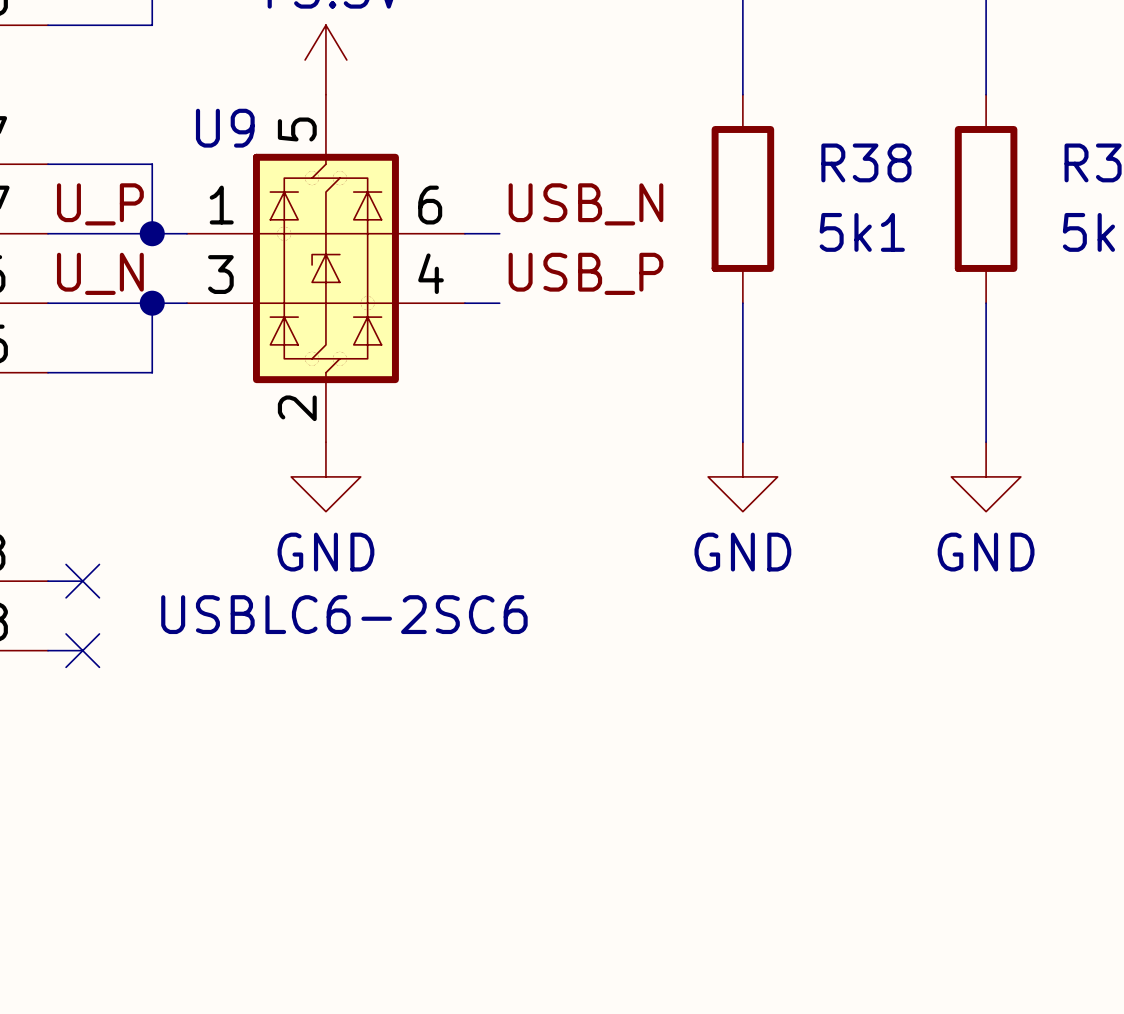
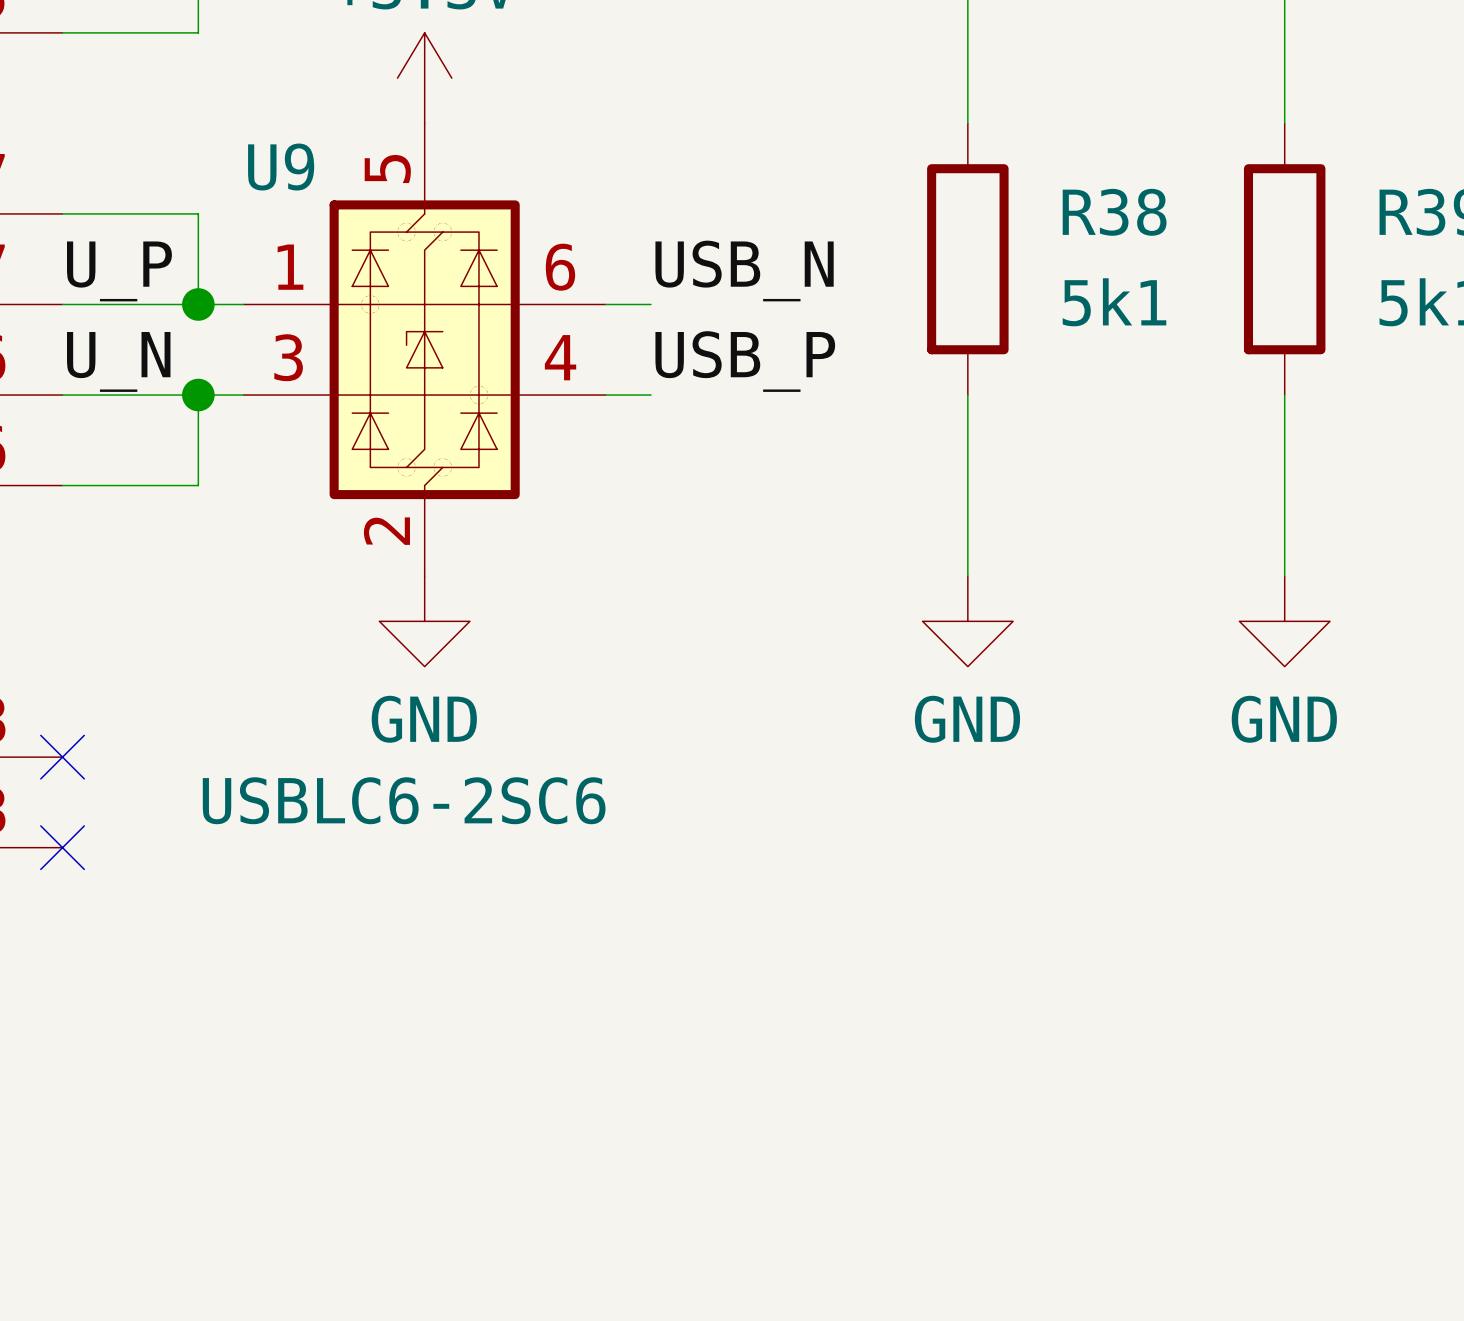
wire: (48, 581) (82, 581) -> none
no-connect mark position: (82, 581) -> (62, 757)
wire: (48, 650) (82, 650) -> none
no-connect mark position: (82, 650) -> (62, 847)

